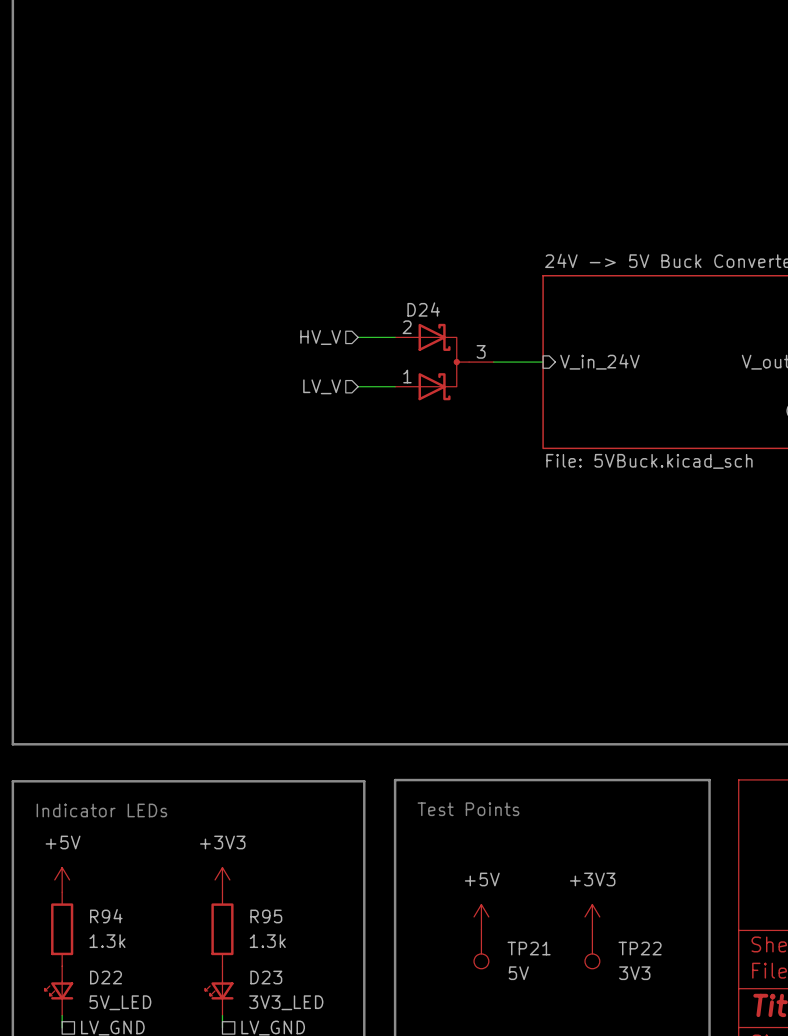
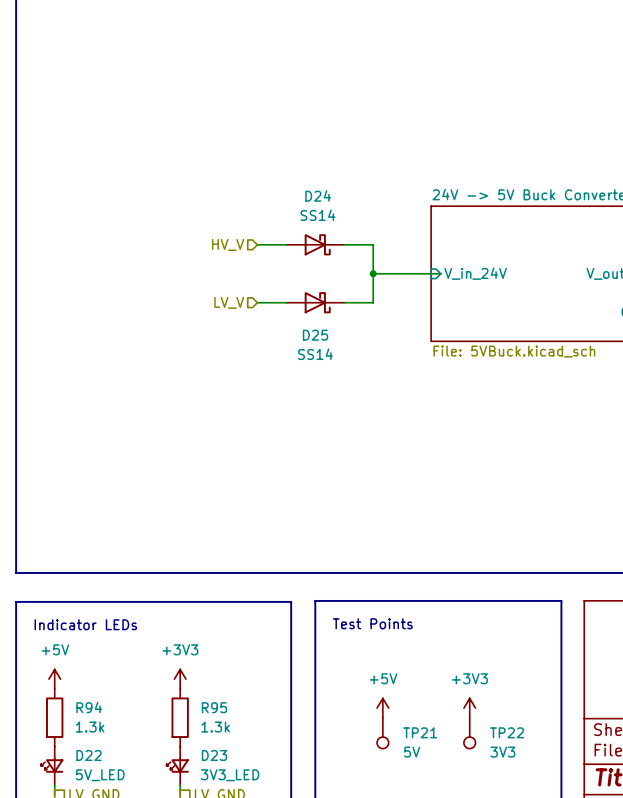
D24 value: none -> SS14 (317, 215)
D24 name position: D24 (423, 309) -> D24 (318, 195)
D24 symbol: [395, 323, 494, 401] -> [286, 234, 345, 256]
wire: none -> (344, 244) (373, 244) (373, 302) (344, 302)
hierarchical label position: HV_V (320, 337) -> HV_V (228, 244)
wire: (358, 337) (395, 337) -> (257, 244) (286, 244)
junction: none -> (373, 273)
wire: none -> (431, 273) (440, 273)
hierarchical label position: LV_V (322, 386) -> LV_V (229, 302)
wire: (358, 386) (395, 386) -> (257, 302) (286, 302)
D25: none -> SS14 (315, 302)

